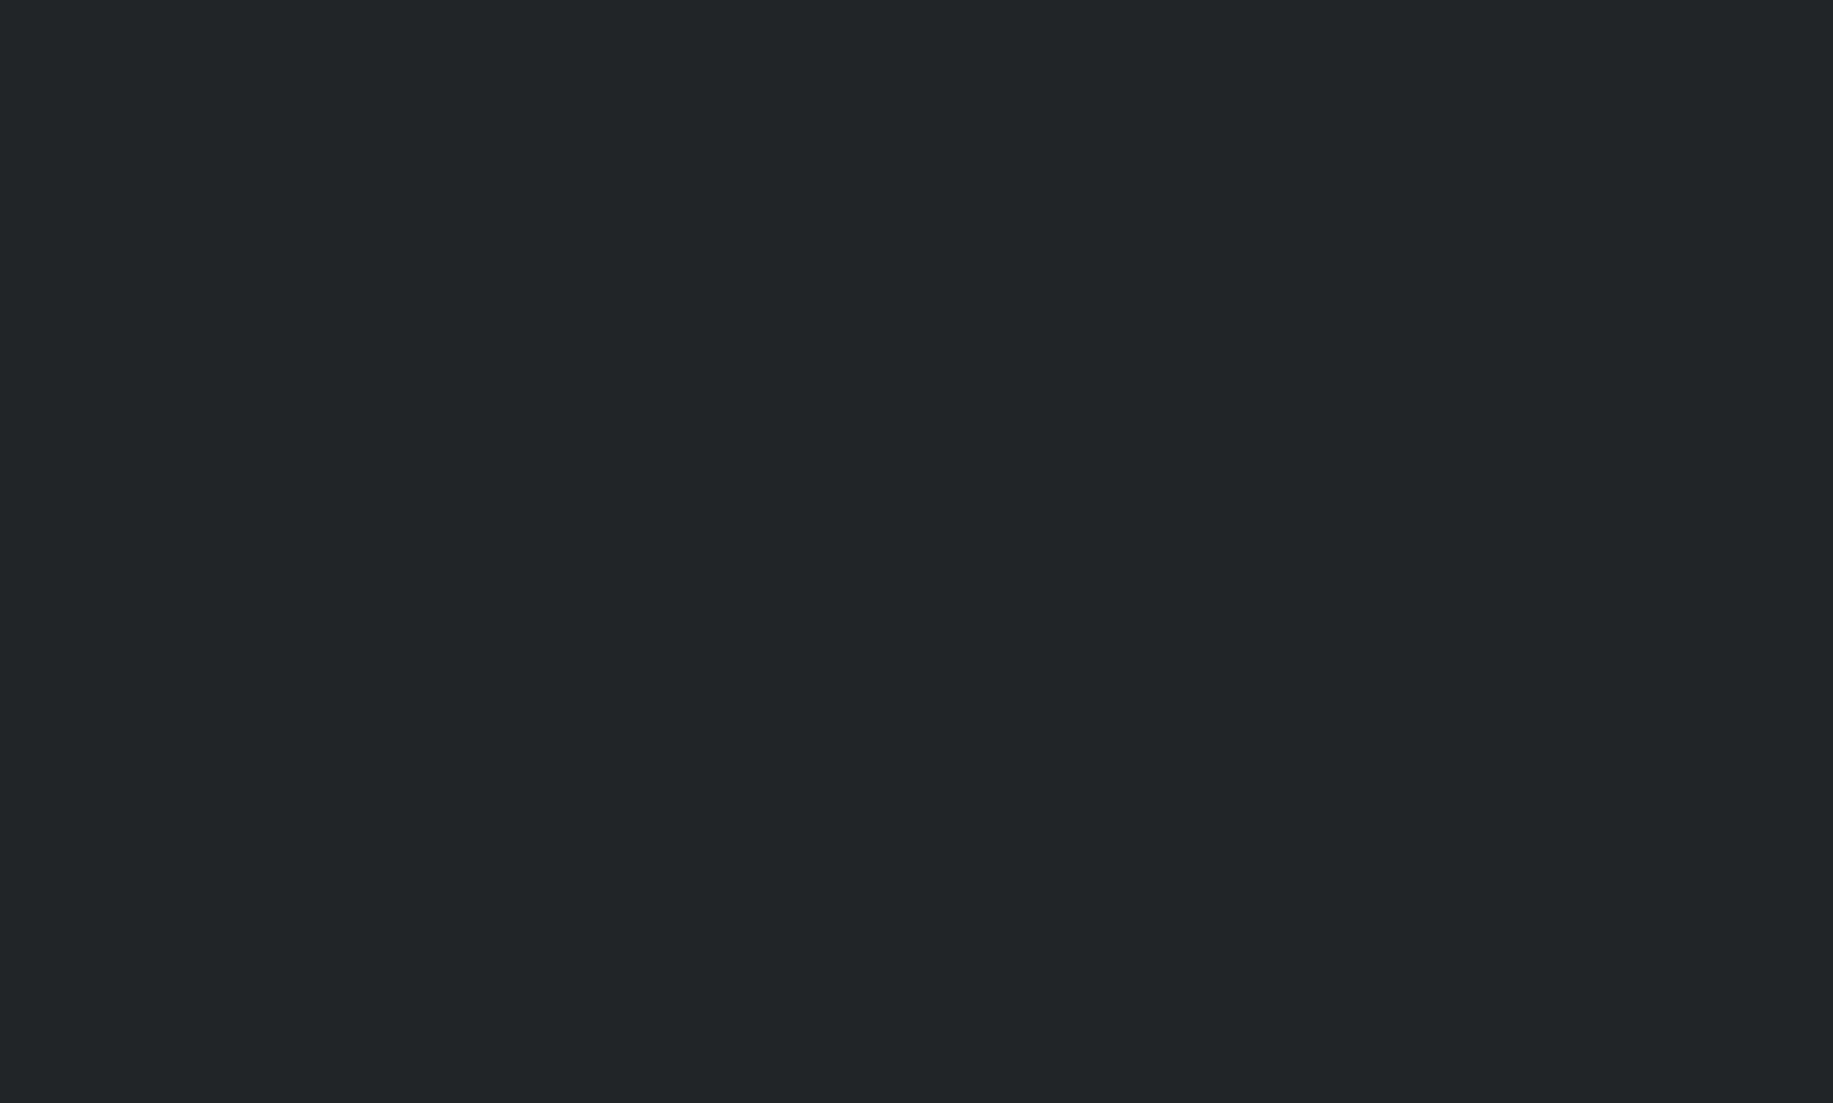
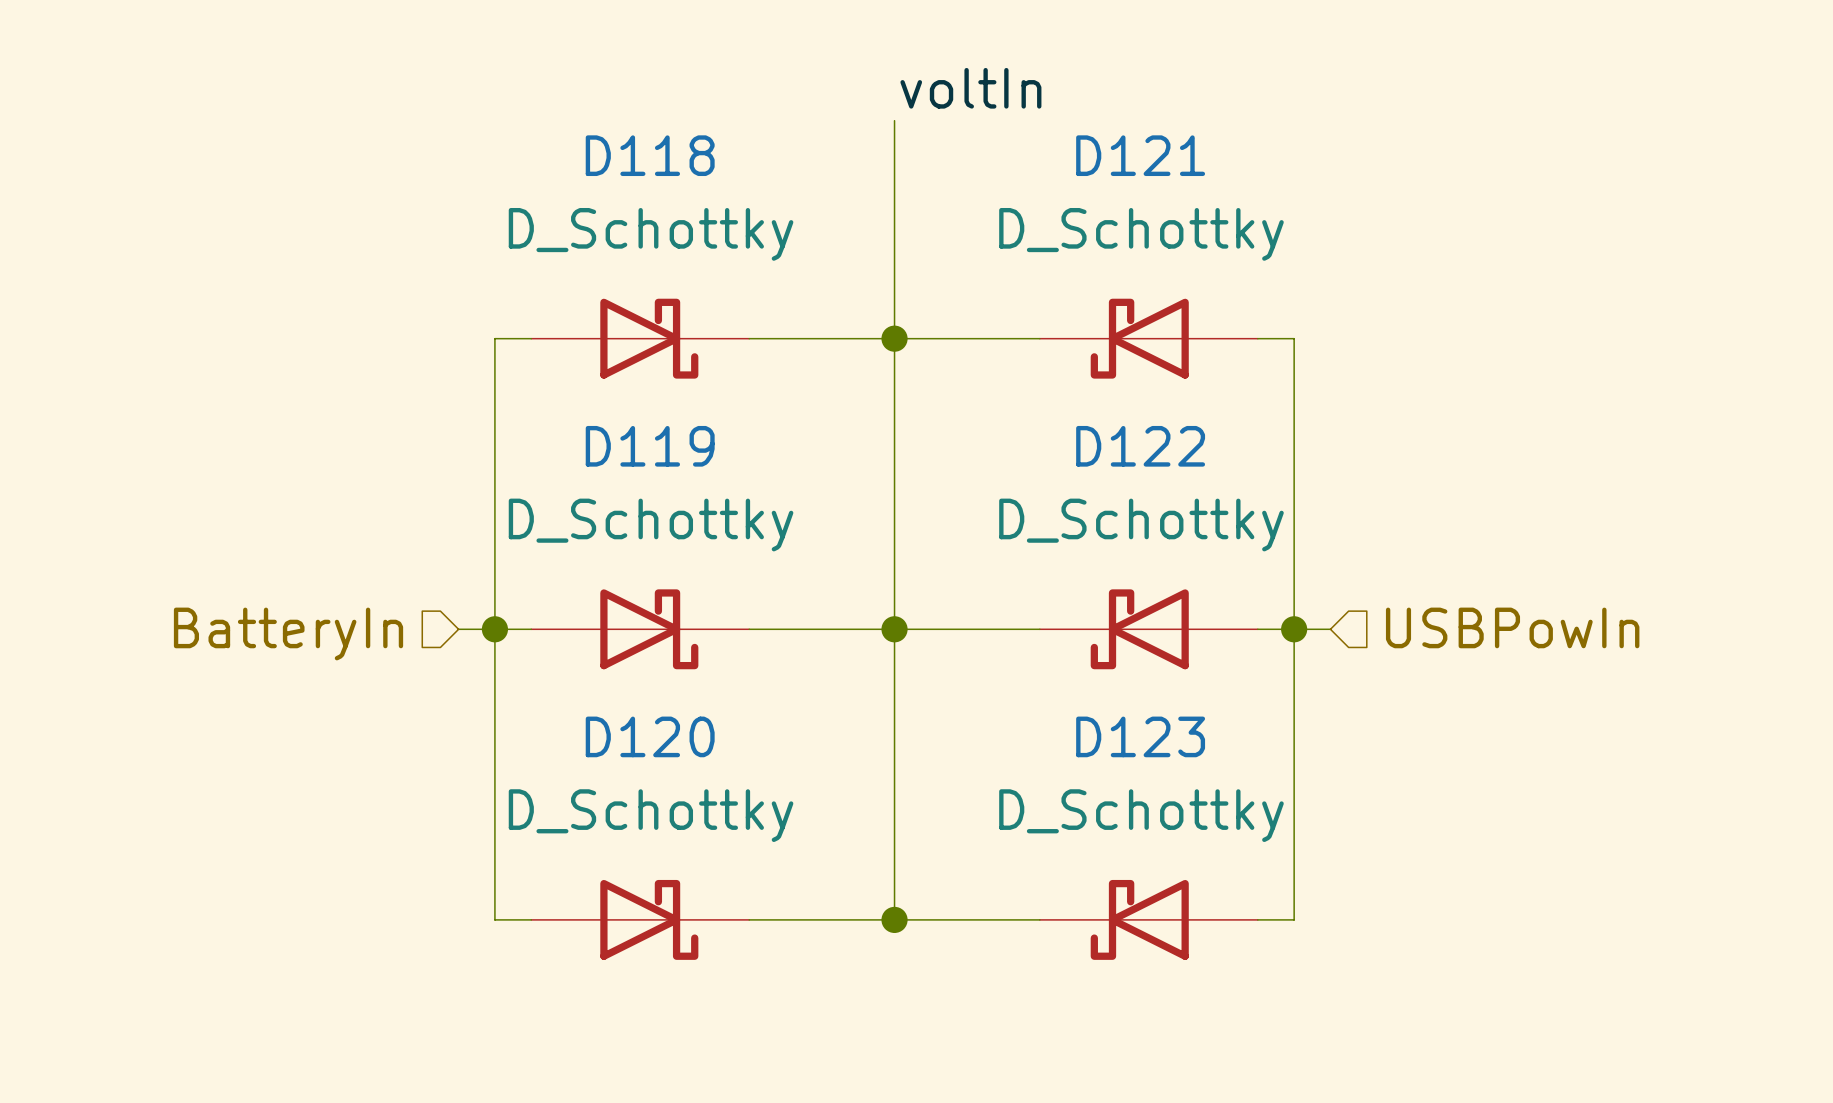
label: none -> voltIn (970, 88)
wire: none -> (894, 120) (894, 919)
wire: none -> (531, 338) (494, 338) (494, 919) (531, 919)
D118: none -> D_Schottky (640, 338)
wire: none -> (749, 338) (1039, 338)
junction: none -> (894, 338)
D121: none -> D_Schottky (1148, 338)
wire: none -> (1257, 338) (1294, 338) (1294, 919) (1257, 919)
hierarchical label: none -> USBPowIn (1512, 627)
wire: none -> (458, 629) (531, 629)
junction: none -> (494, 629)
D119: none -> D_Schottky (640, 629)
wire: none -> (749, 629) (1039, 629)
junction: none -> (894, 629)
D122: none -> D_Schottky (1148, 629)
wire: none -> (1257, 629) (1330, 629)
junction: none -> (1294, 629)
hierarchical label: none -> BatteryIn (288, 633)
D120: none -> D_Schottky (640, 919)
wire: none -> (749, 919) (1039, 919)
junction: none -> (894, 919)
D123: none -> D_Schottky (1148, 919)

